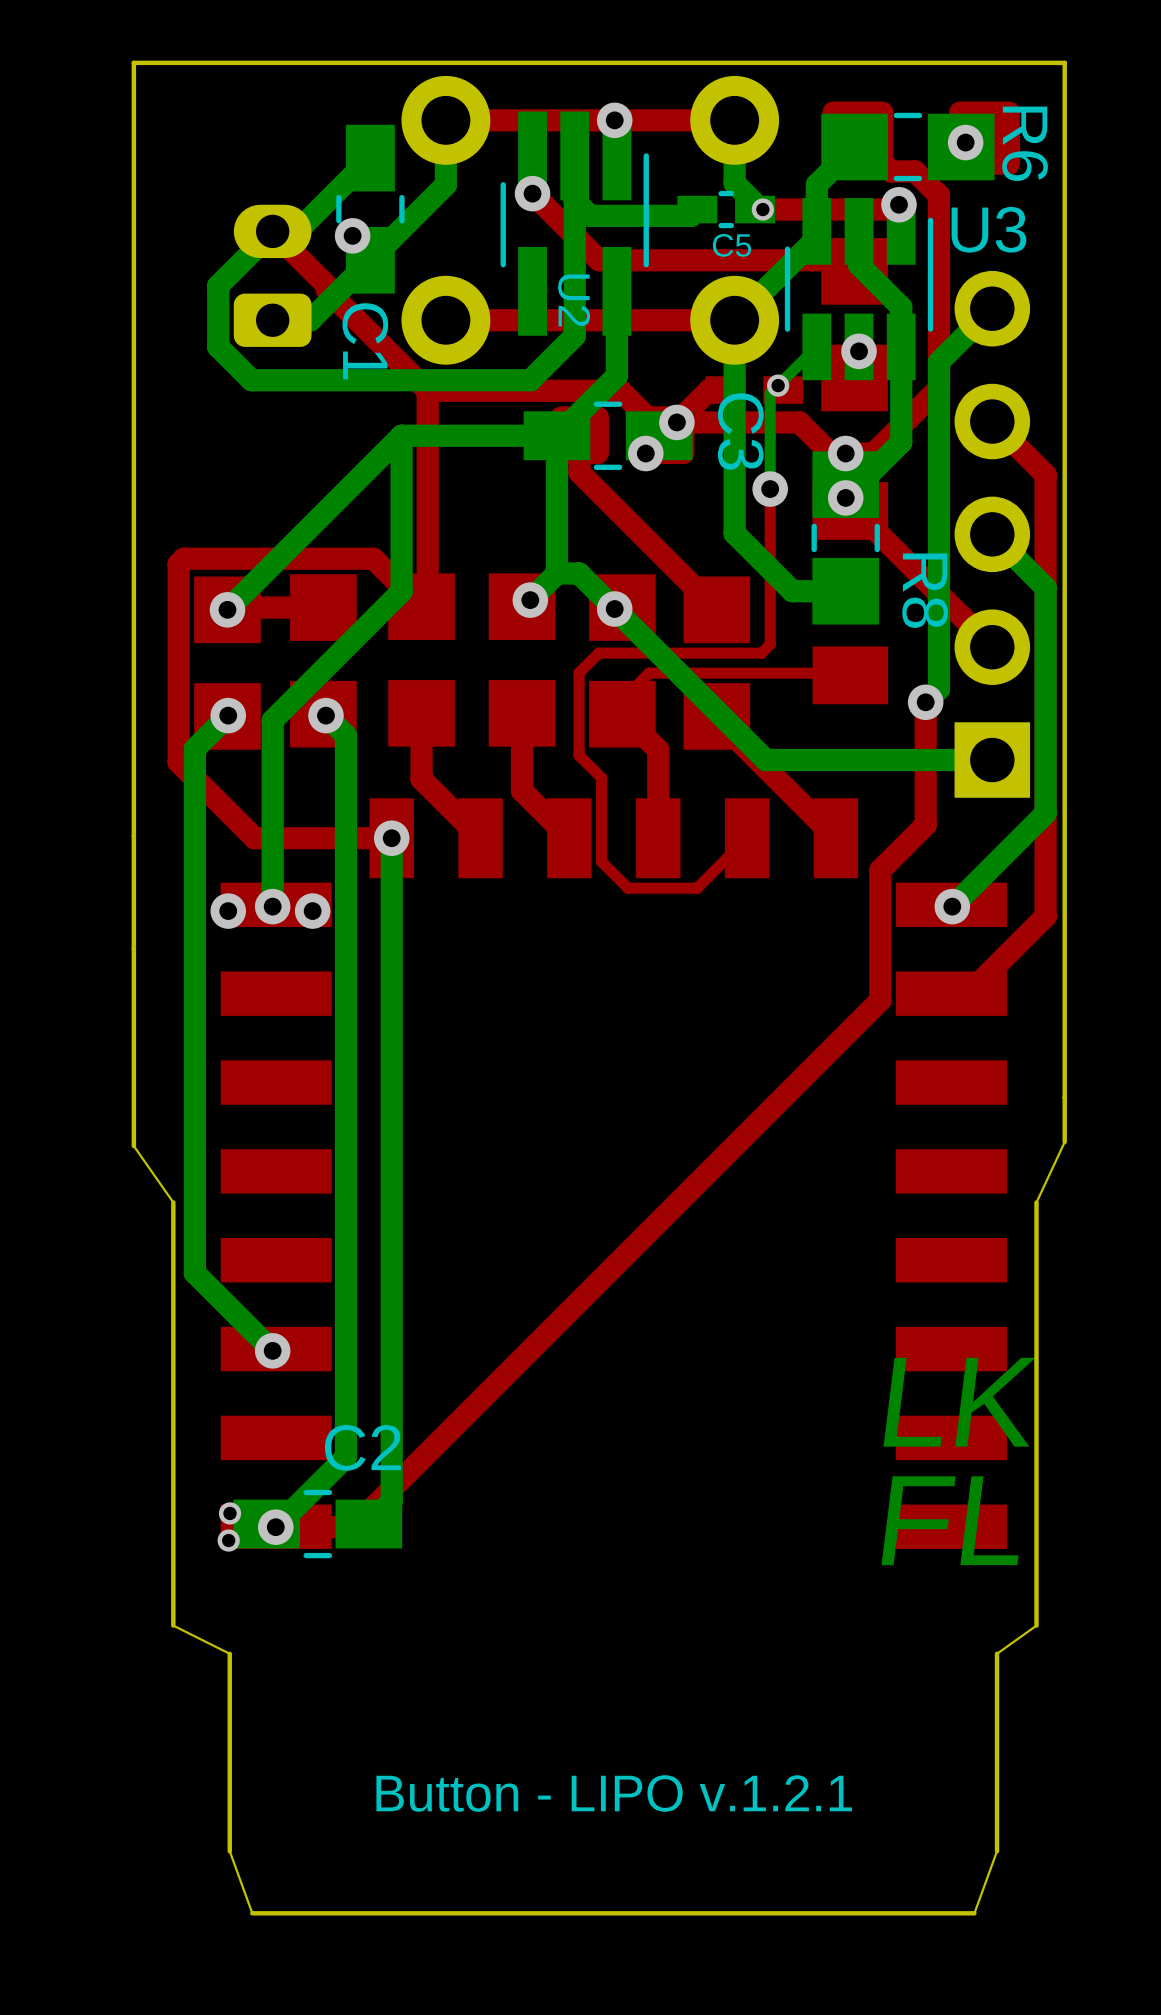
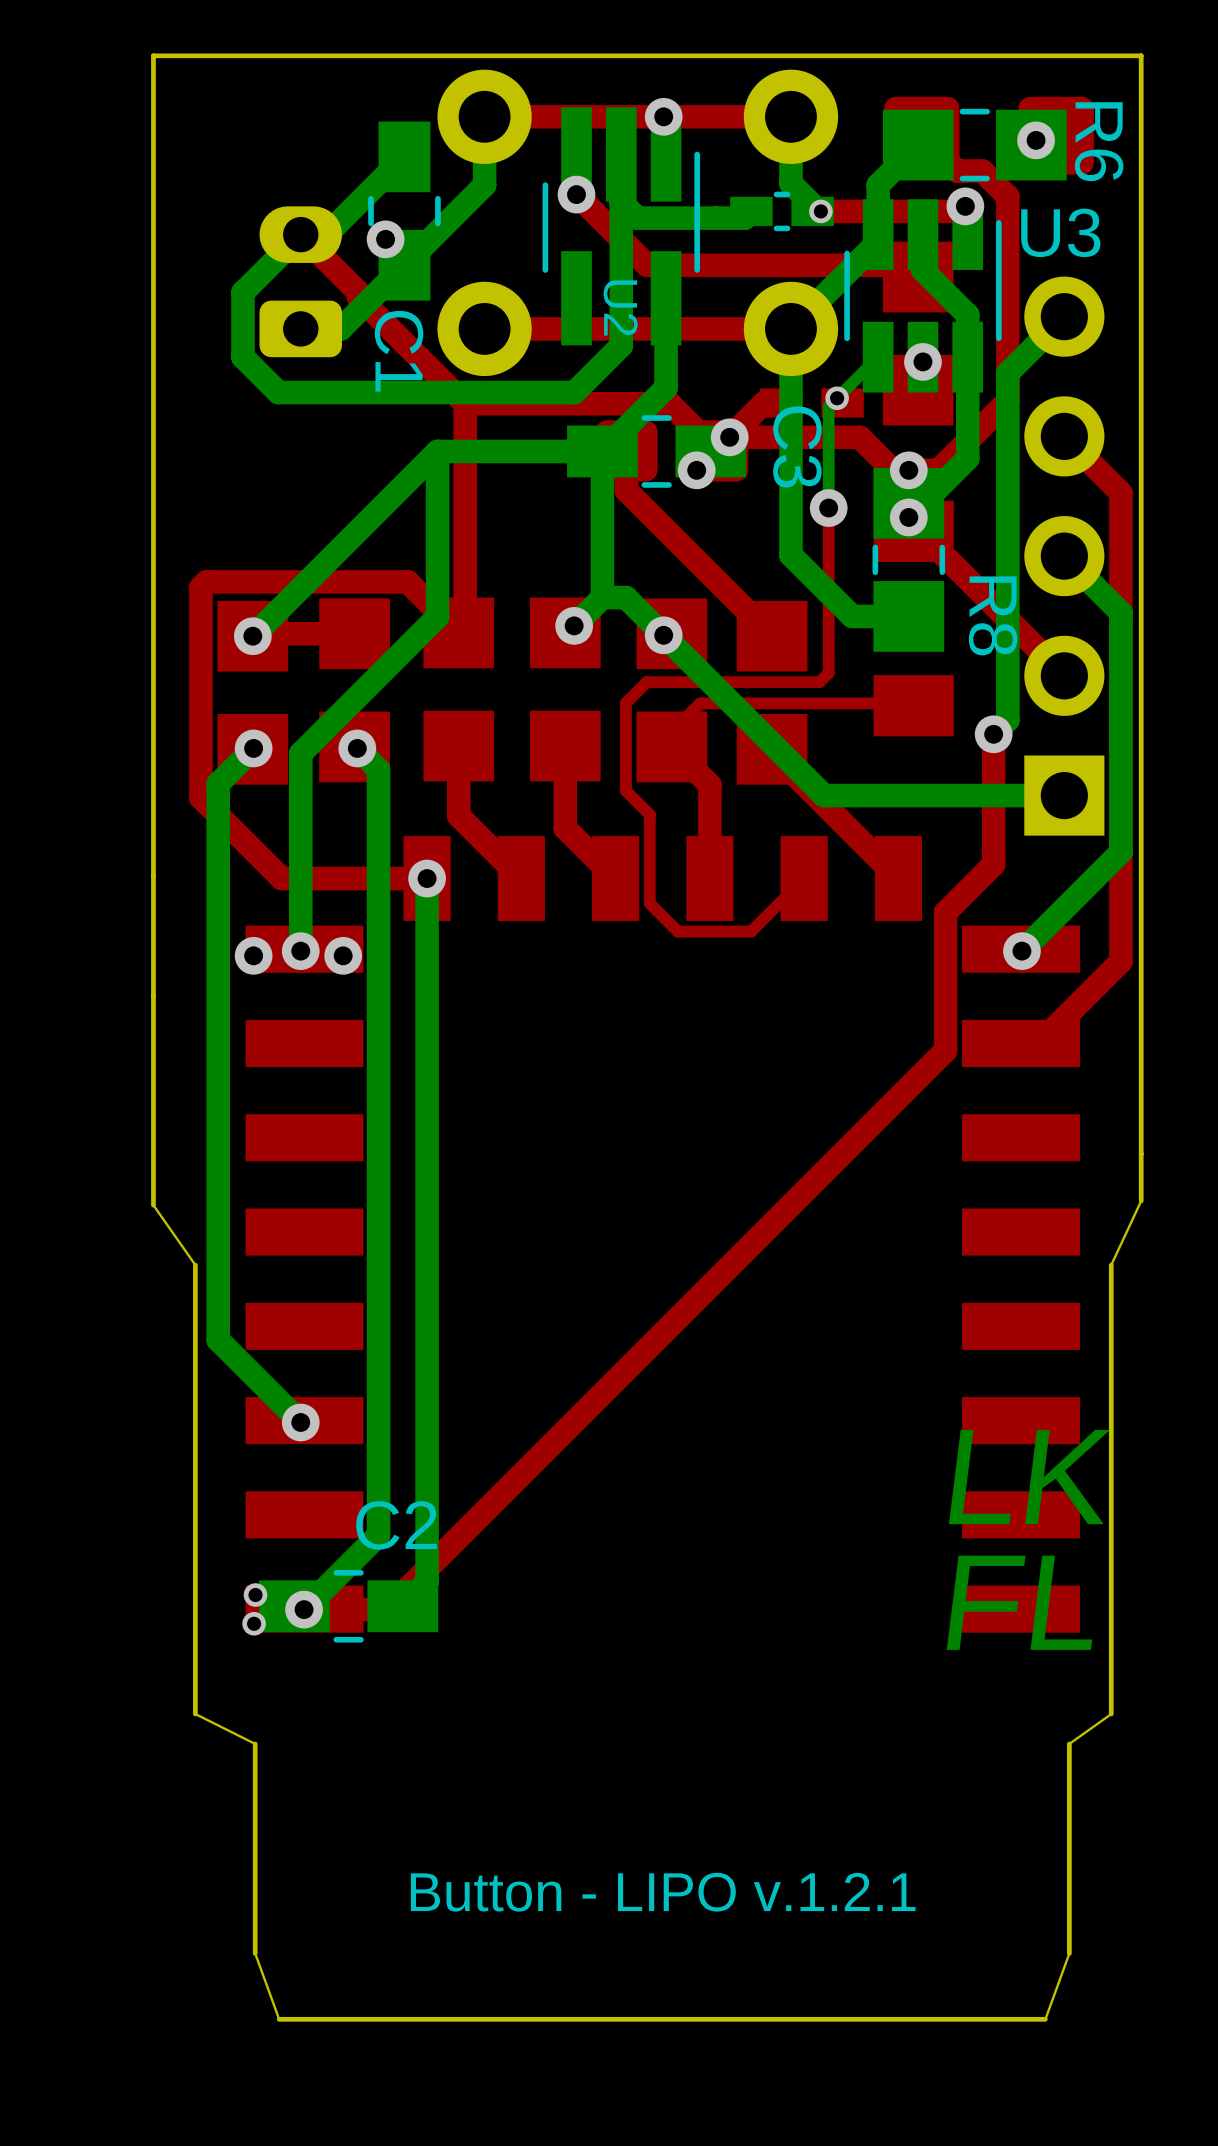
C5 name: C5 (732, 245) -> none

